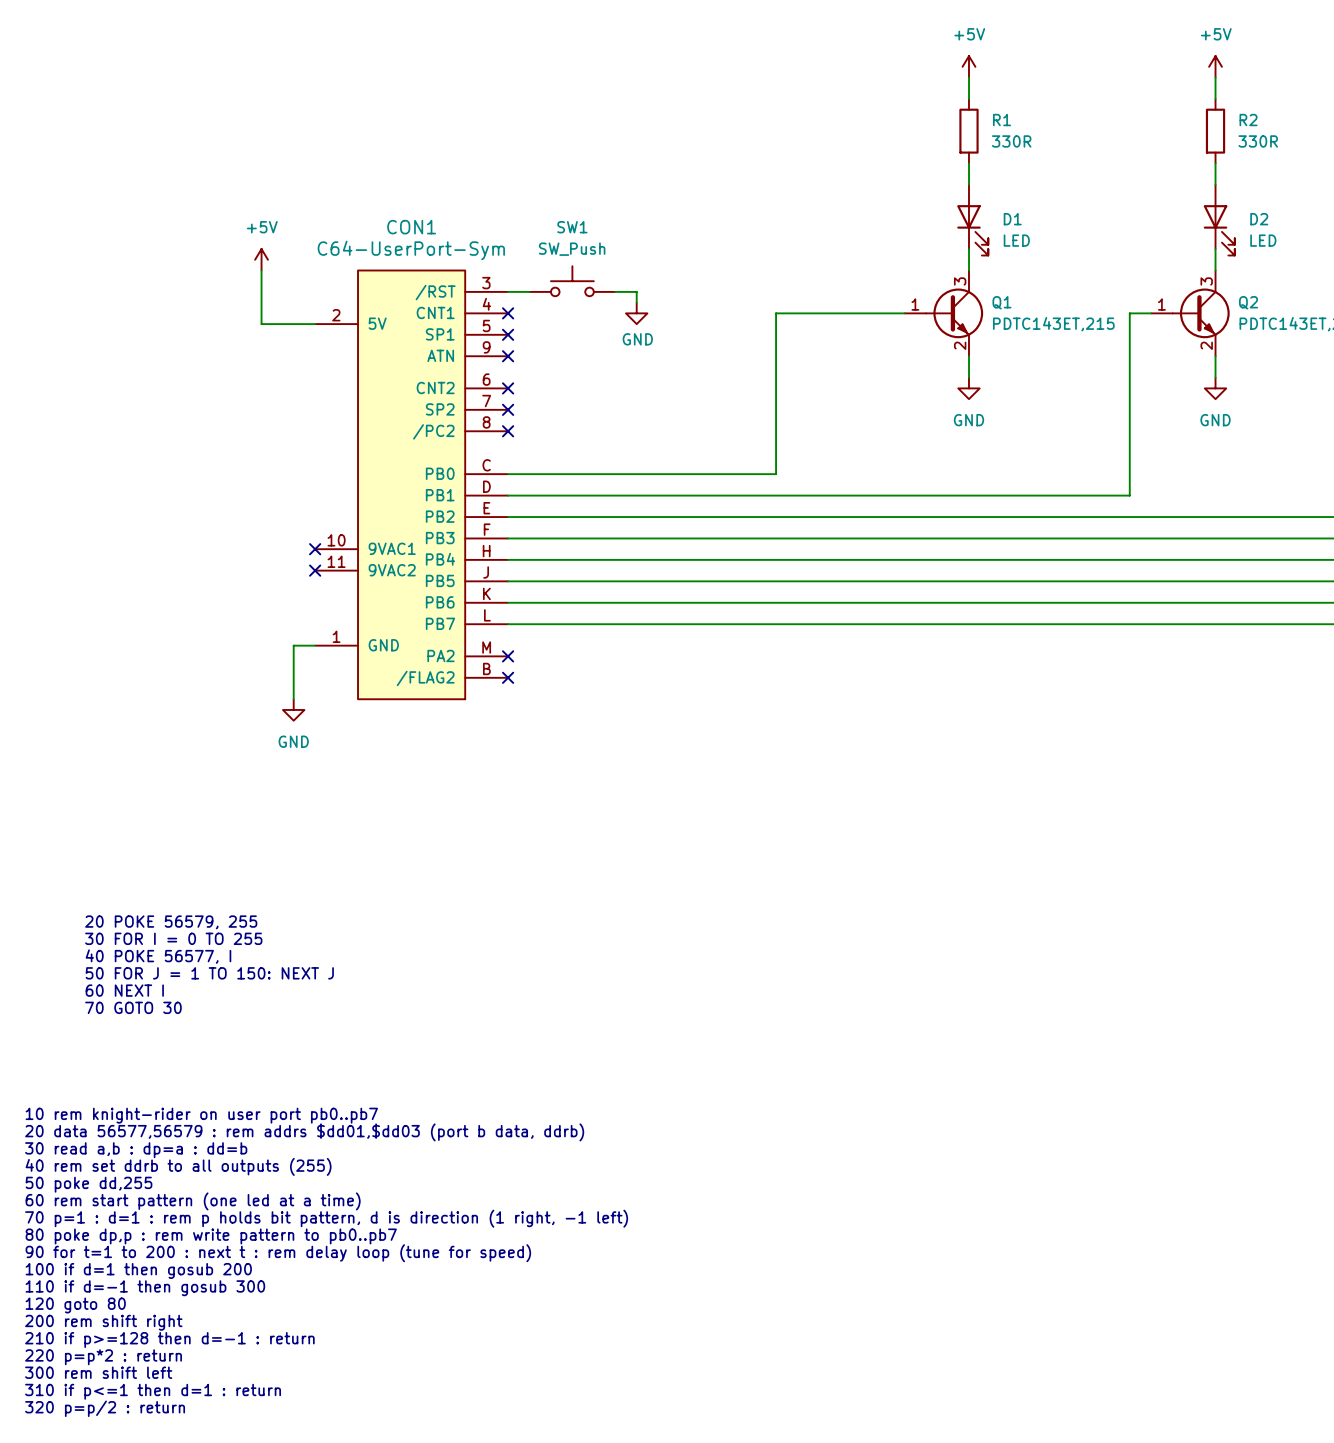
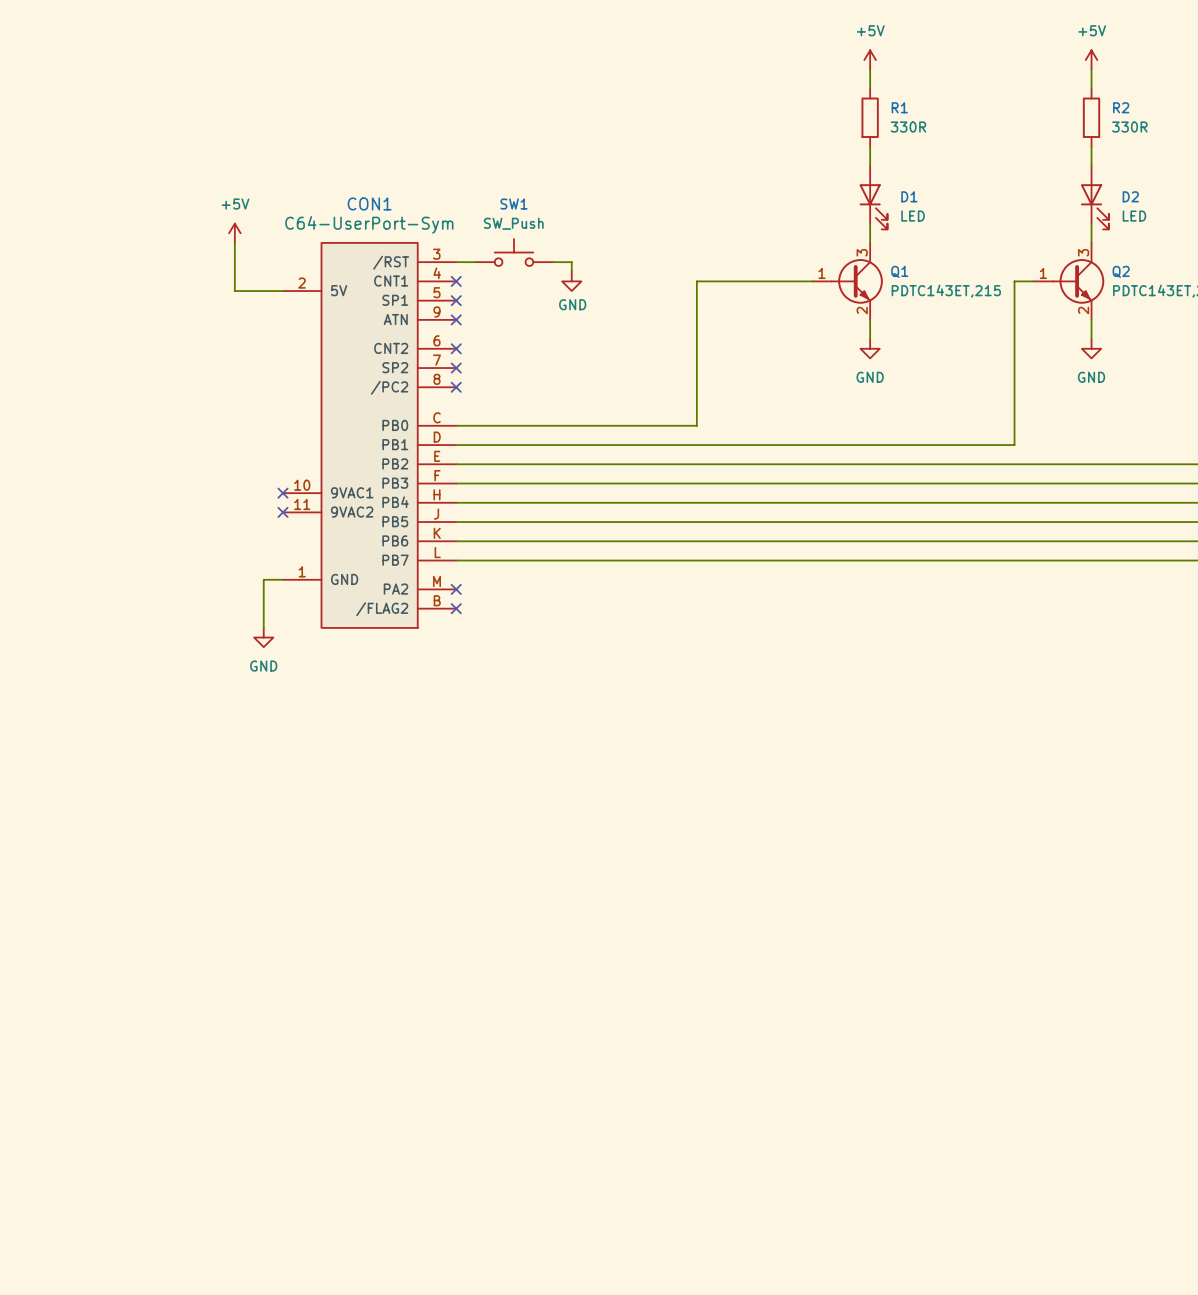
text: 20 POKE 56579, 255 (171, 922) -> none
text: 30 FOR I = 0 TO 255 (173, 938) -> none
text: 40 POKE 56577, I (158, 956) -> none
text: 50 FOR J = 1 TO 150: NEXT J (209, 973) -> none
text: 60 NEXT I (124, 990) -> none
text: 70 GOTO 30 (133, 1007) -> none
text: 10 rem knight-rider on user port pb0..pb7 (201, 1115) -> none
text: 20 data 56577,56579 : rem addrs $dd01,$dd03 (port b data, ddrb) (304, 1132) -> none
text: 30 read a,b : dp=a : dd=b (136, 1150) -> none
text: 40 rem set ddrb to all outputs (255) (178, 1166) -> none
text: 50 poke dd,255 (89, 1184) -> none
text: 60 rem start pattern (one led at a time) (193, 1201) -> none
text: 70 p=1 : d=1 : rem p holds bit pattern, d is direction (1 right, -1 left) (326, 1218) -> none
text: 80 poke dp,p : rem write pattern to pb0..pb7 (211, 1236) -> none
text: 90 for t=1 to 200 : next t : rem delay loop (tune for speed) (278, 1253) -> none
text: 100 if d=1 then gosub 200 (138, 1270) -> none
text: 110 if d=-1 then gosub 300 (145, 1288) -> none
text: 120 goto 80 (75, 1305) -> none
text: 200 rem shift right (103, 1322) -> none
text: 210 if p>=128 then d=-1 : return (169, 1340) -> none
text: 220 p=p*2 : return (103, 1357) -> none
text: 300 rem shift left (98, 1372) -> none
text: 310 if p<=1 then d=1 : return (153, 1391) -> none
text: 320 p=p/2 : return (105, 1408) -> none

